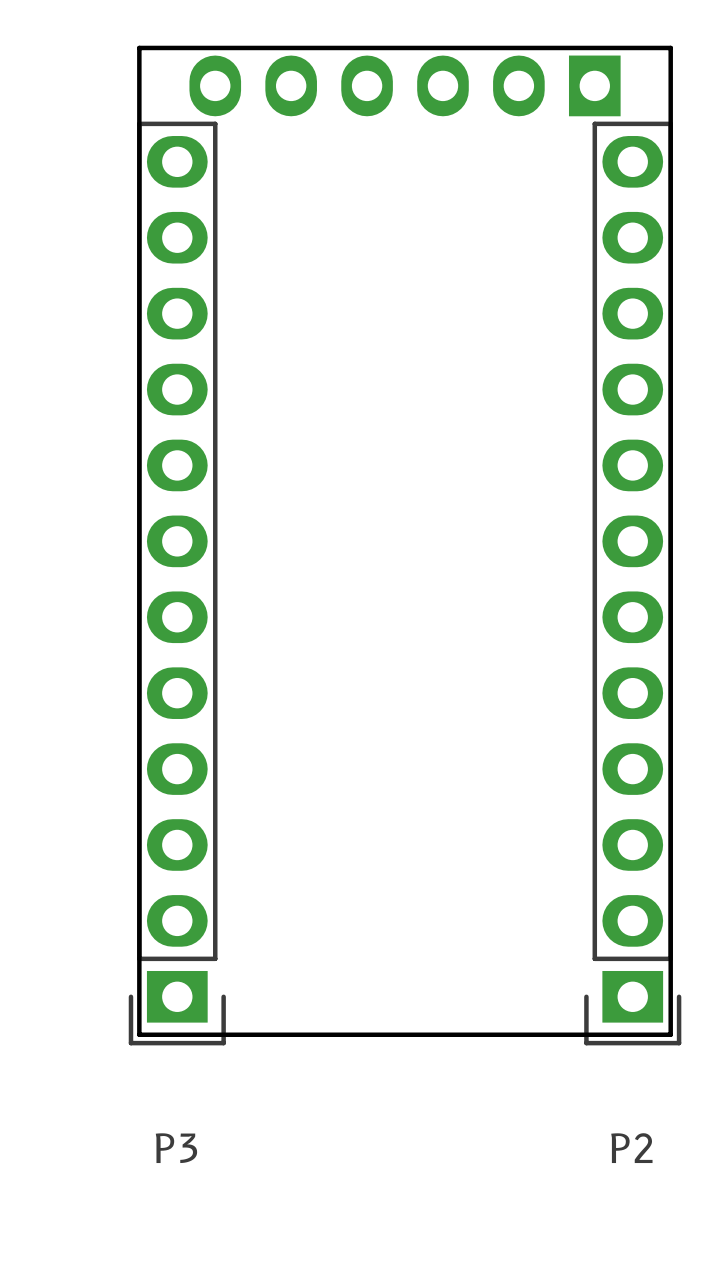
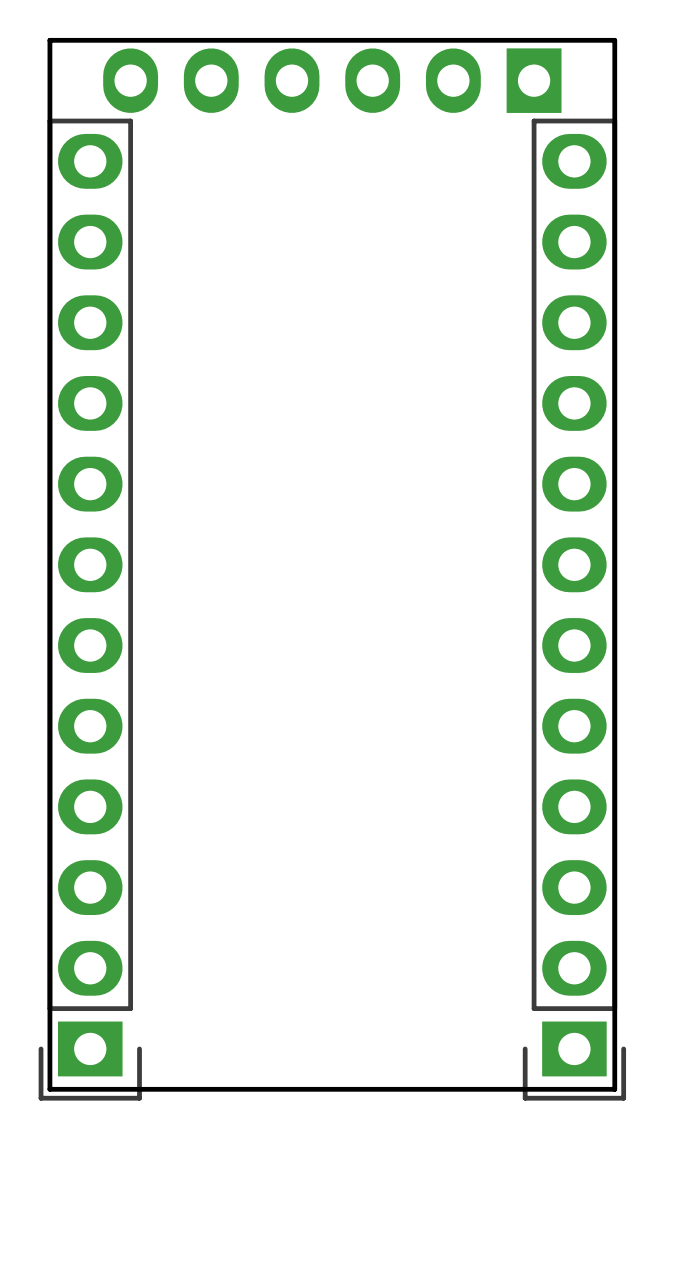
P3 name: P3 (176, 1148) -> none
P2 name: P2 (631, 1148) -> none

